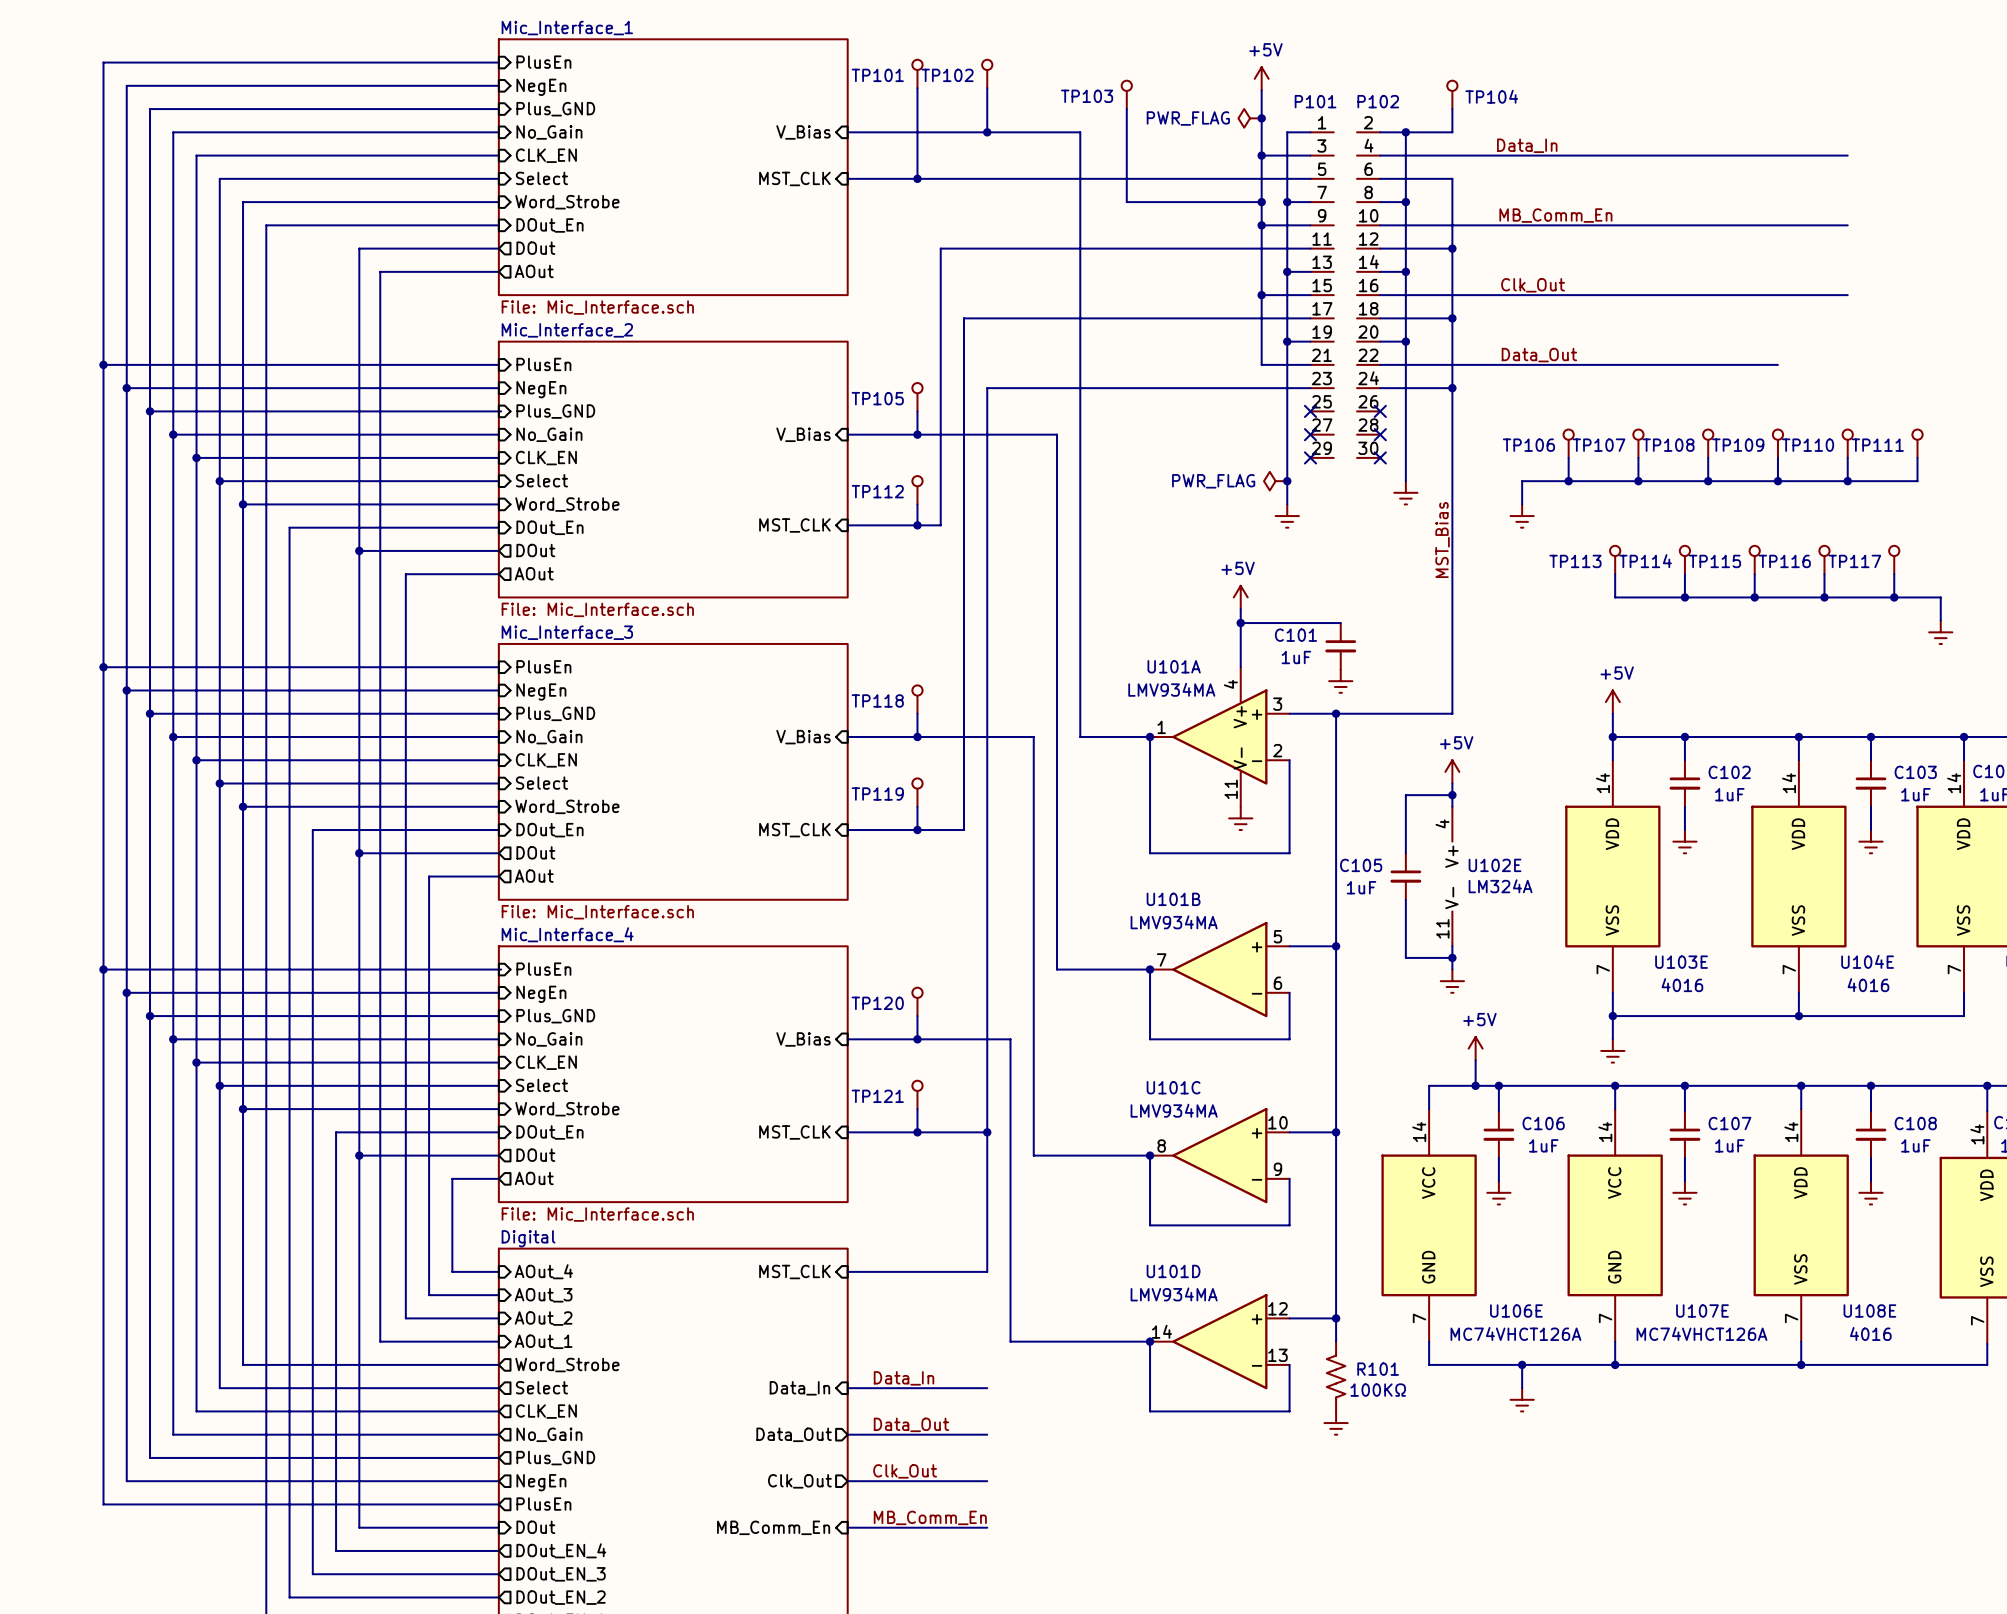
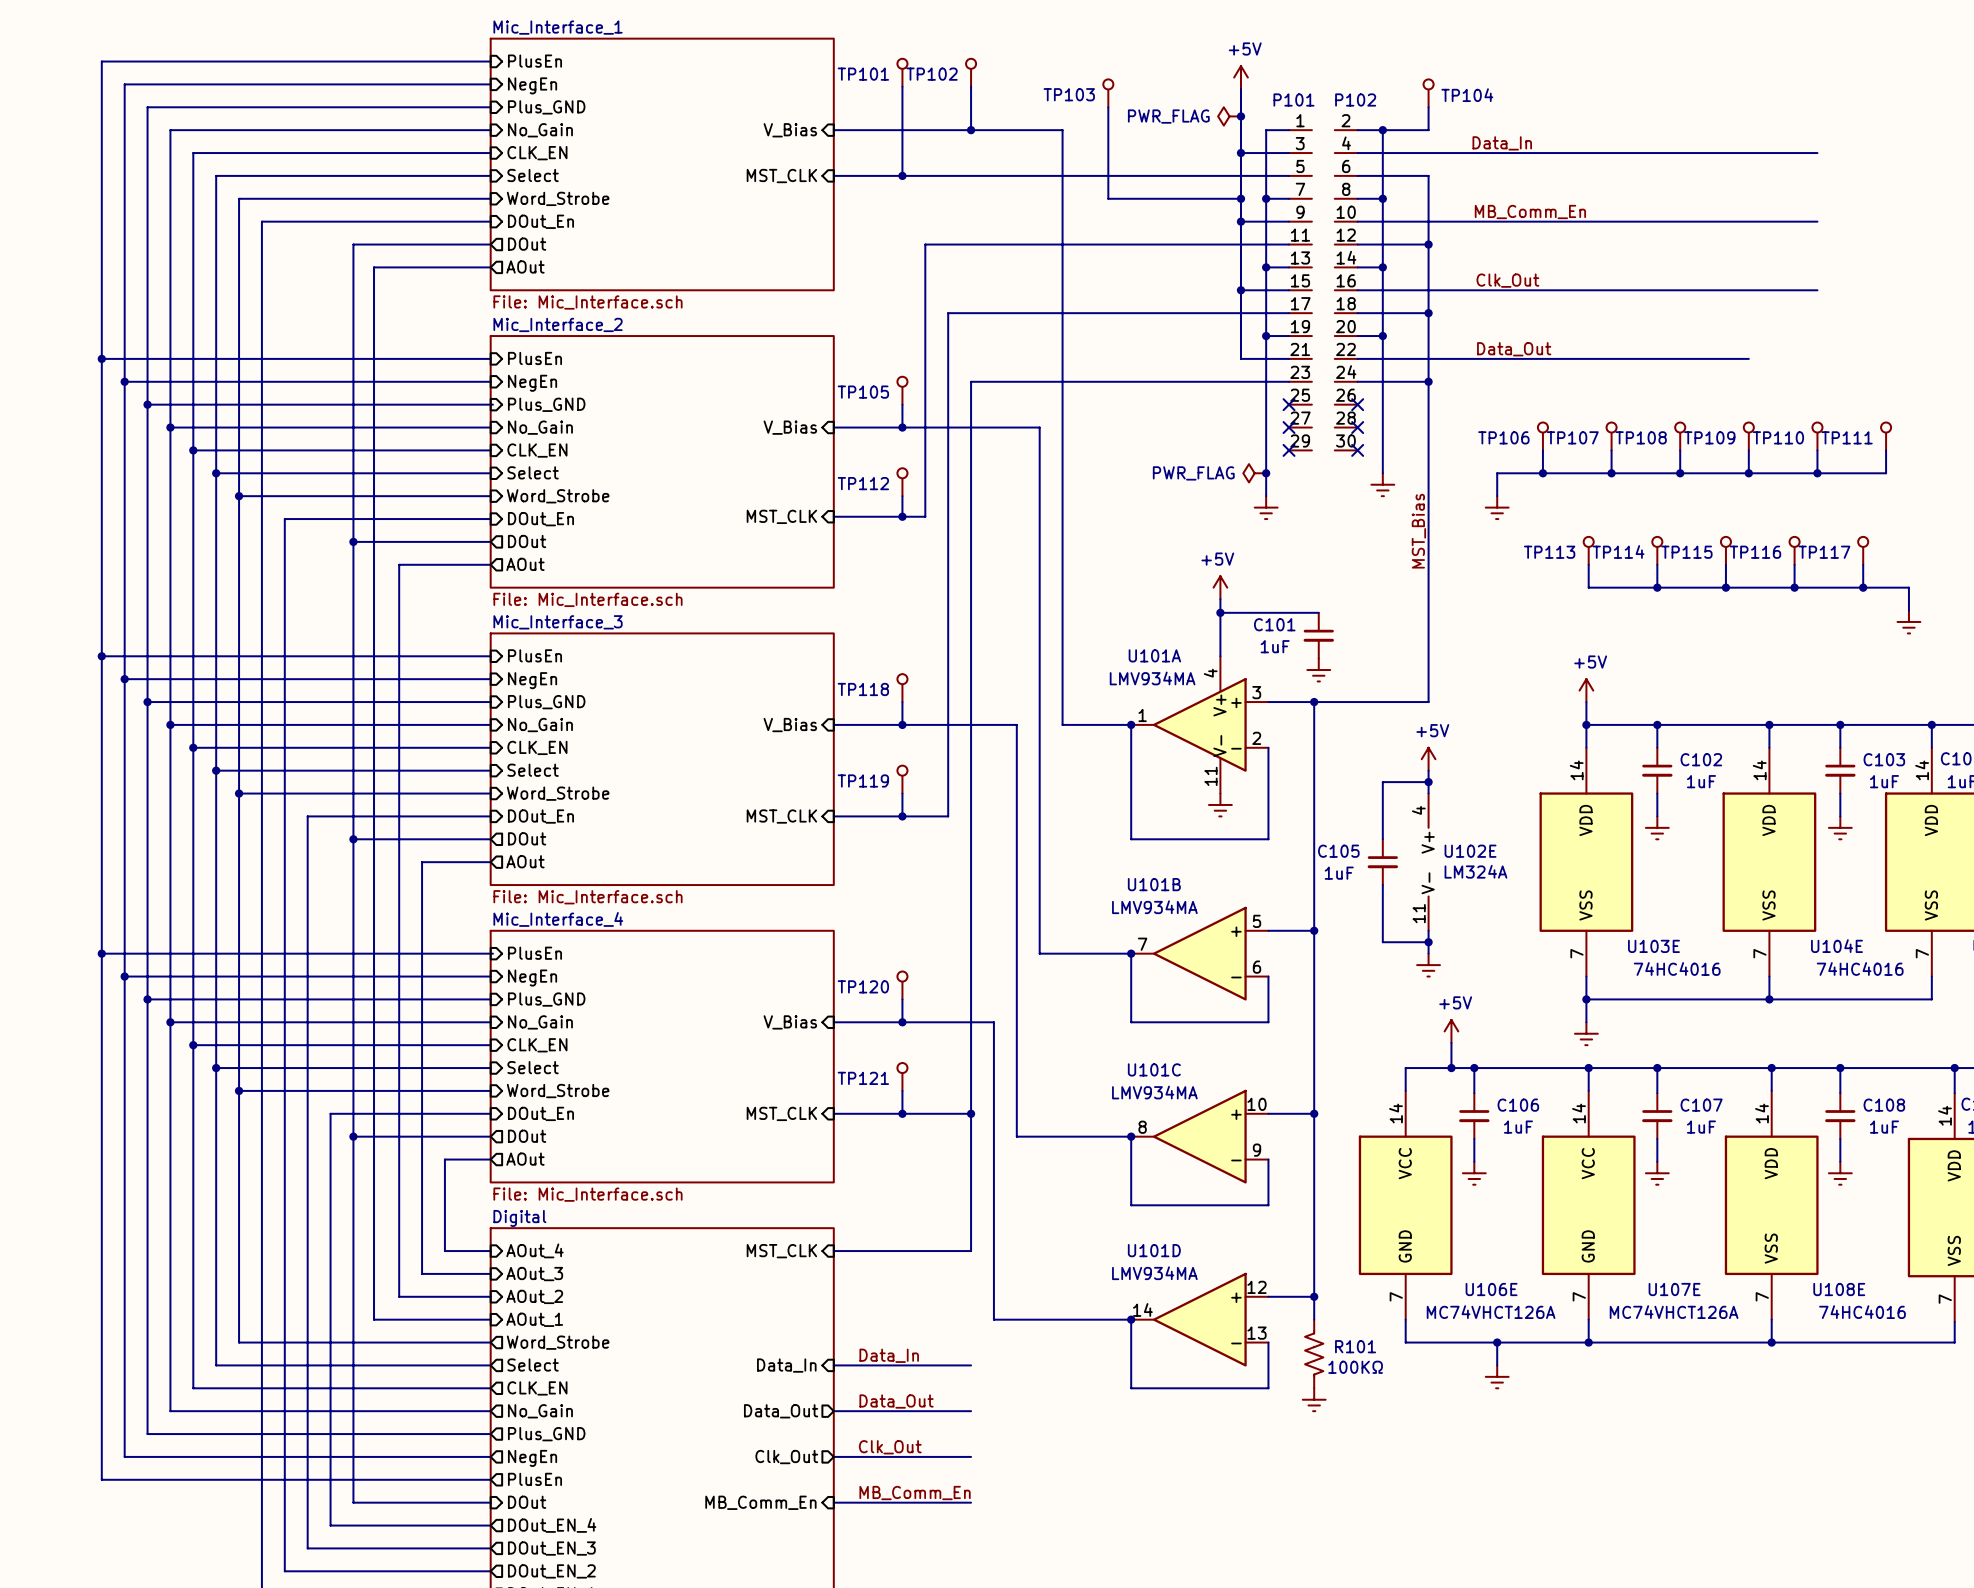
U103E value: 4016 (1682, 985) -> 74HC4016 (1677, 968)
U104E value: 4016 (1868, 985) -> 74HC4016 (1860, 968)
U108E value: 4016 (1870, 1333) -> 74HC4016 (1862, 1312)

